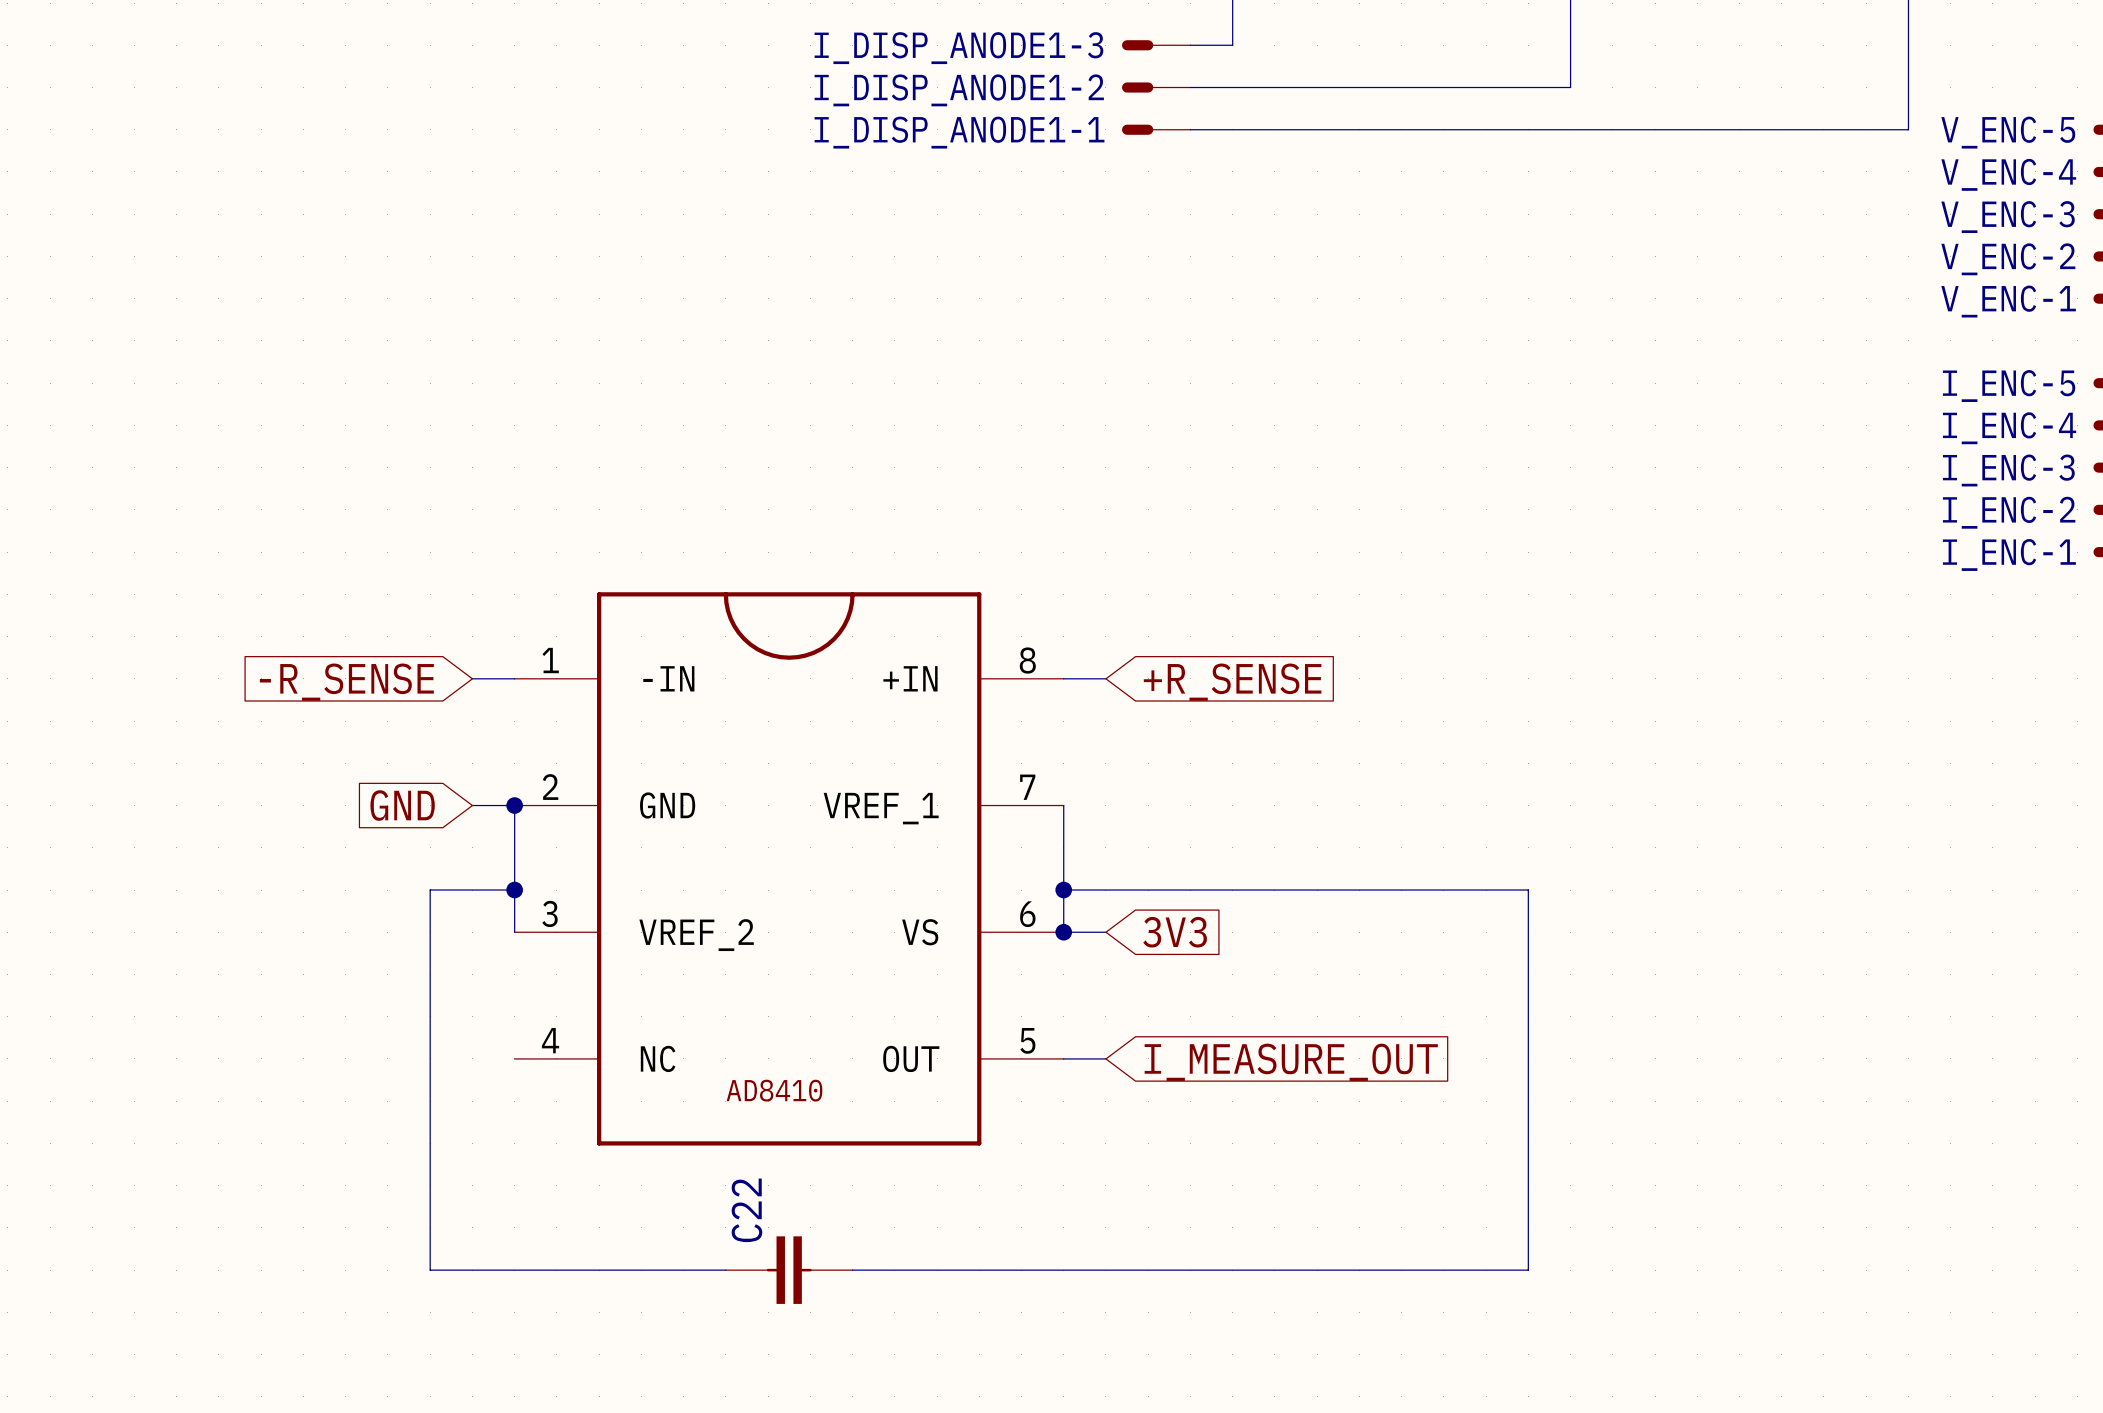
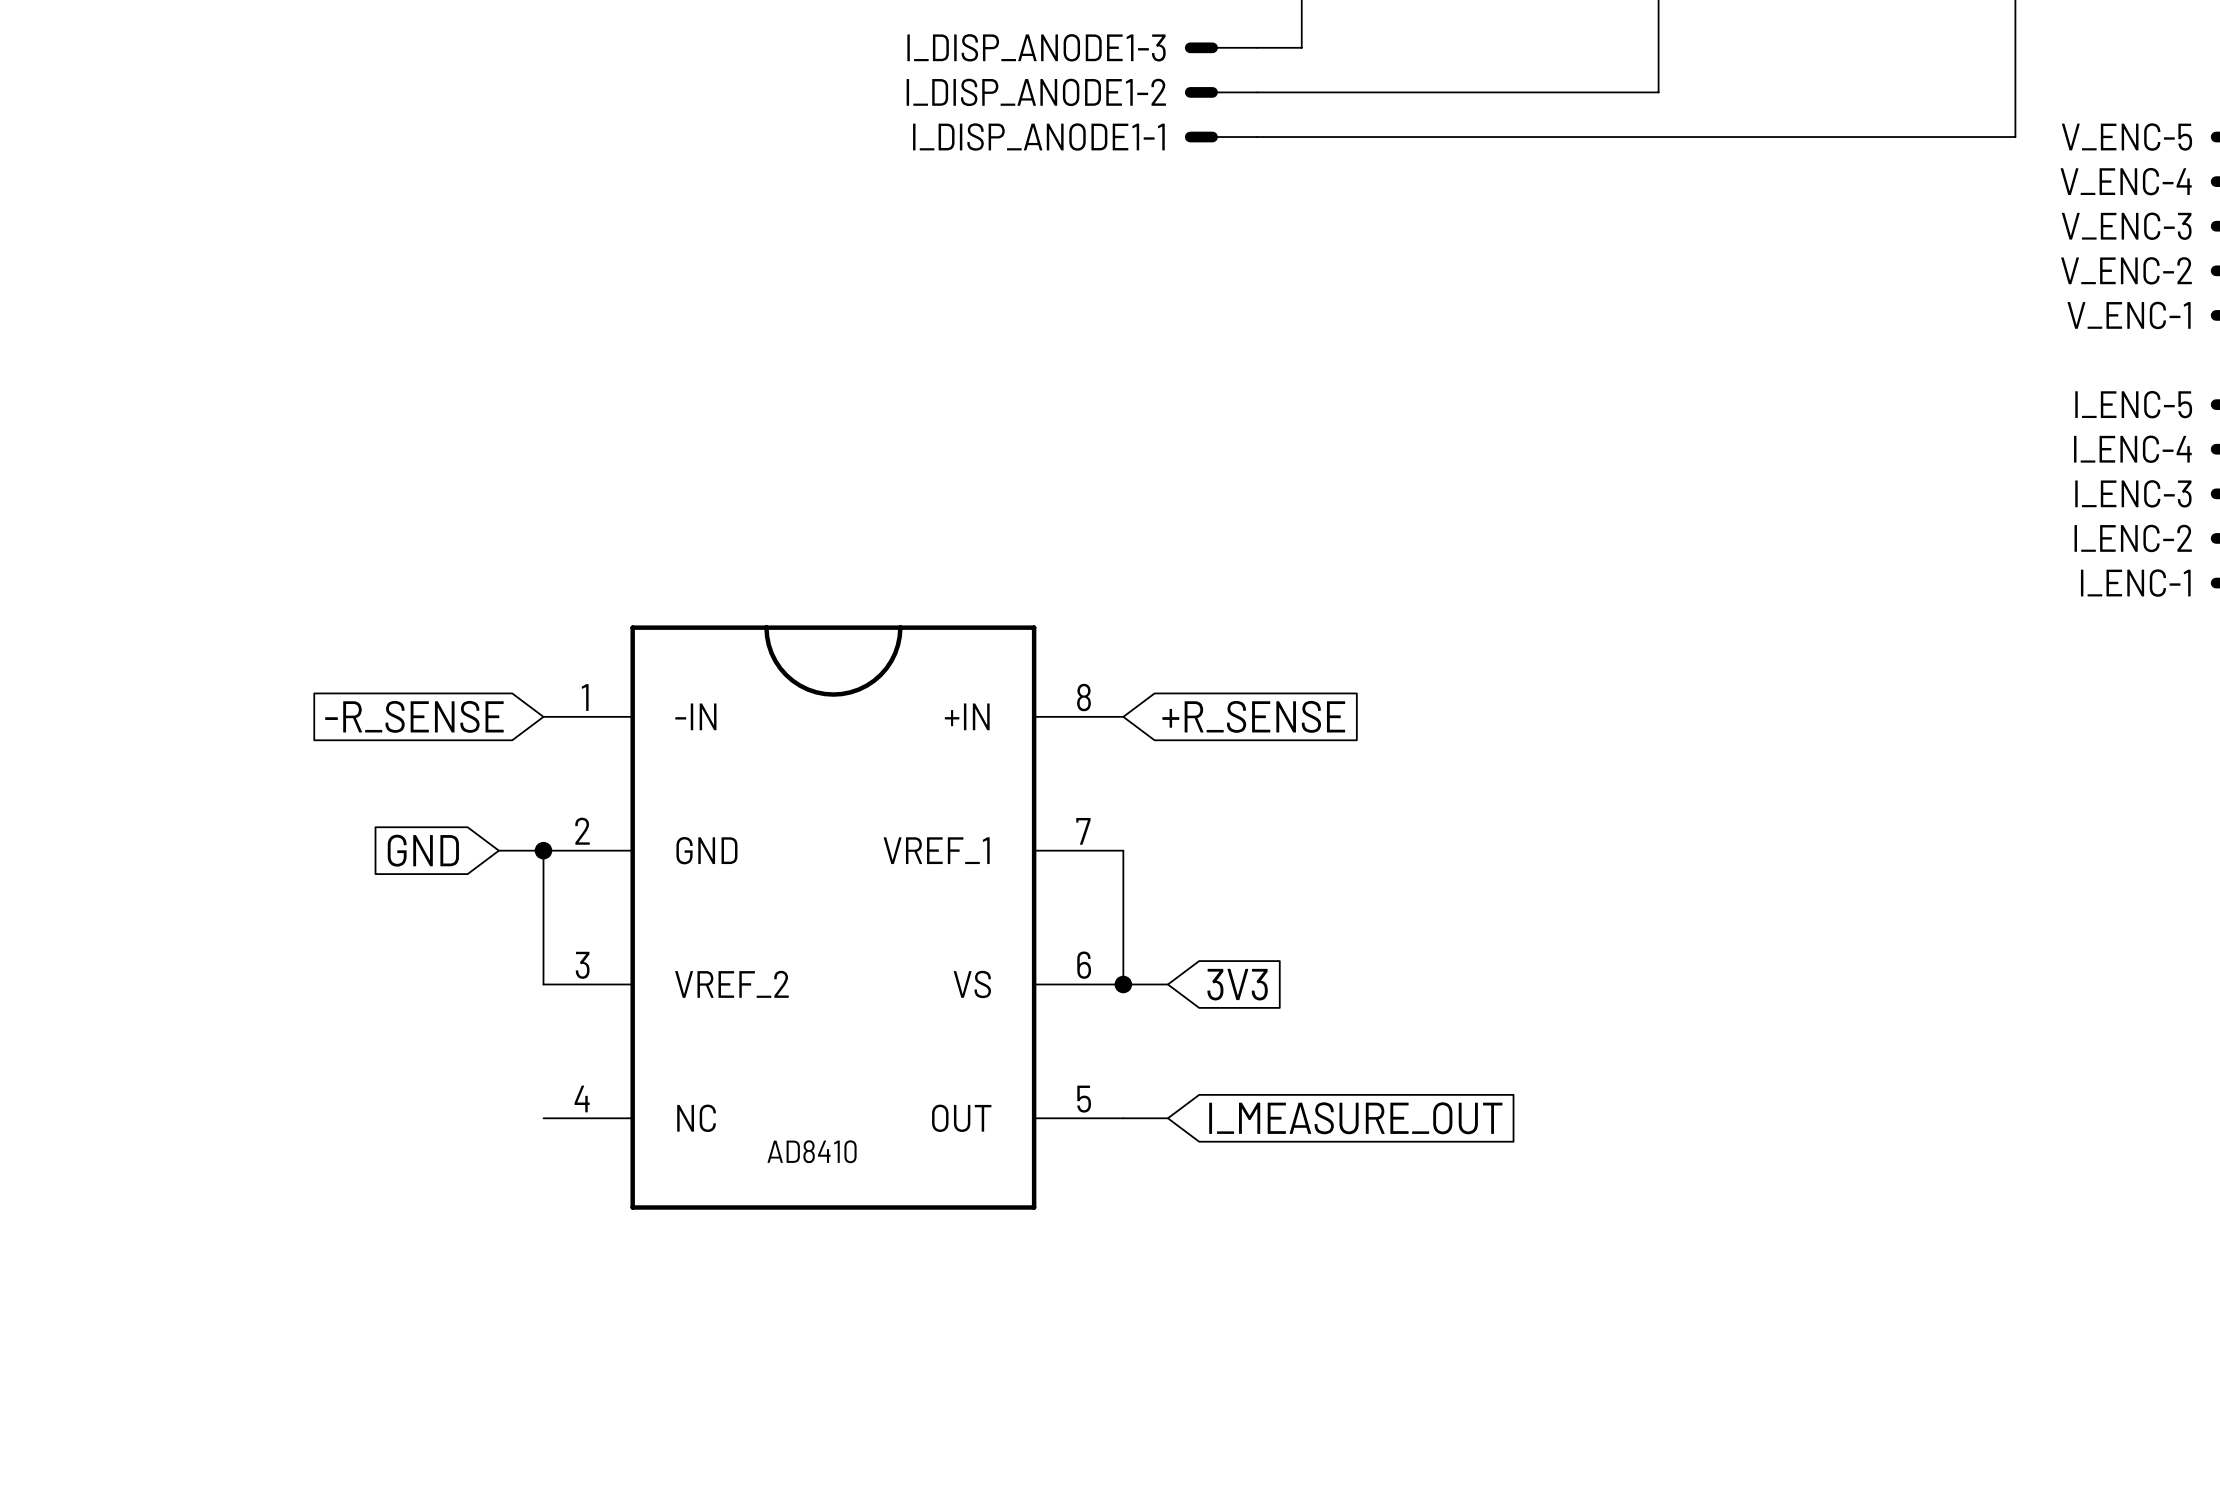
wire: (472, 678) (514, 678) -> none
wire: (1063, 678) (1105, 678) -> none
global label position: -R_SENSE (346, 682) -> -R_SENSE (414, 716)
global label position: +R_SENSE (1232, 682) -> +R_SENSE (1253, 716)
wire: (514, 890) (430, 890) (430, 1270) (725, 1270) -> none
junction: (514, 890) -> none
wire: (1063, 890) (1528, 890) (1528, 1270) (852, 1270) -> none
junction: (1063, 890) -> none
C22: (789, 1270) -> none

